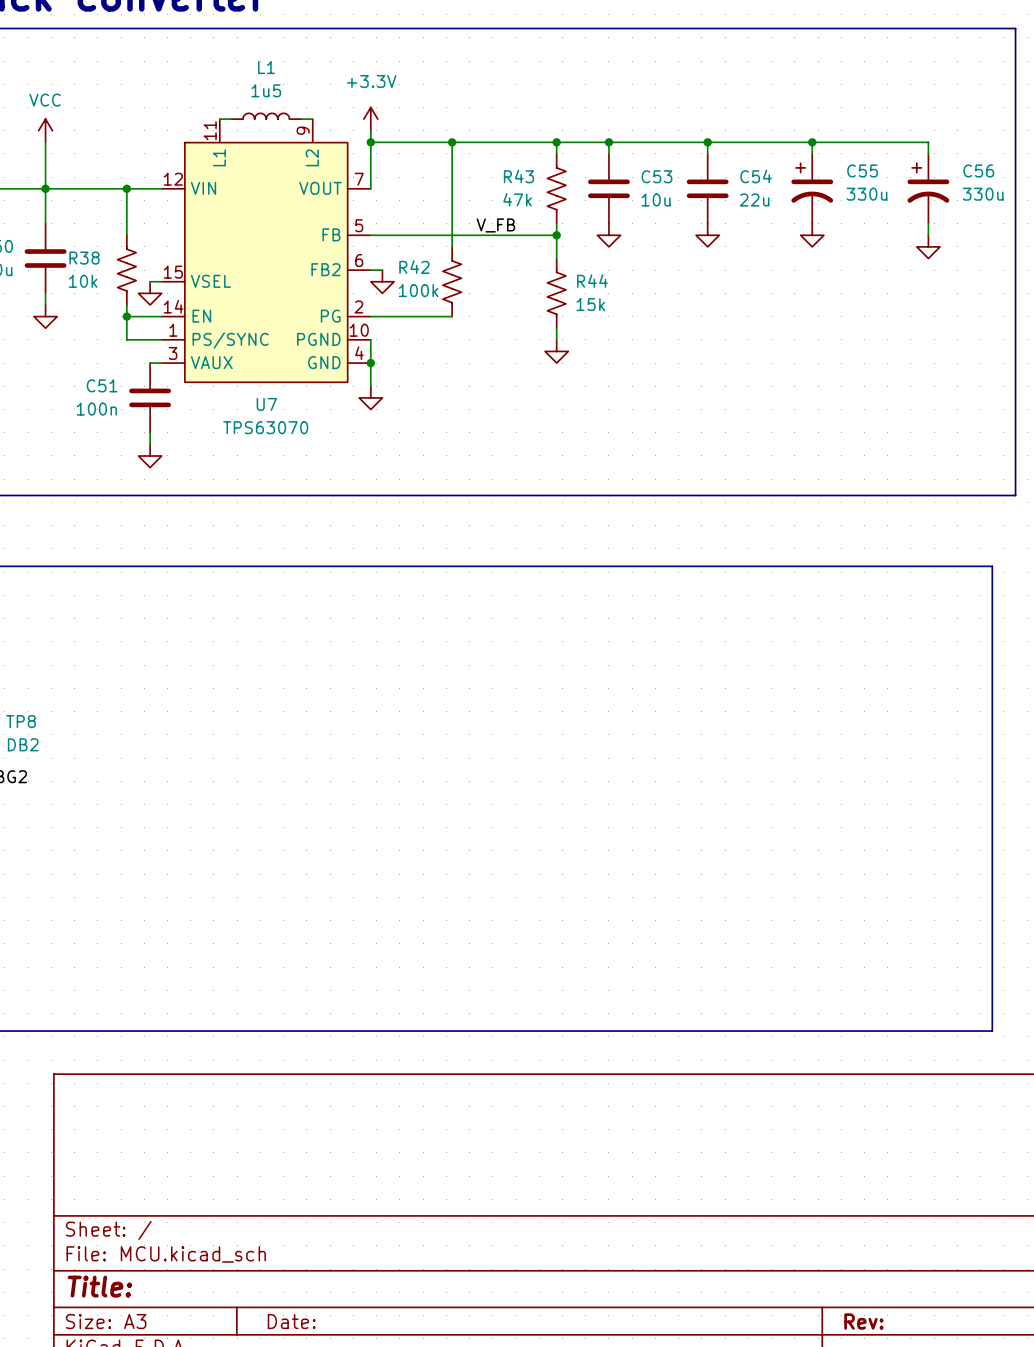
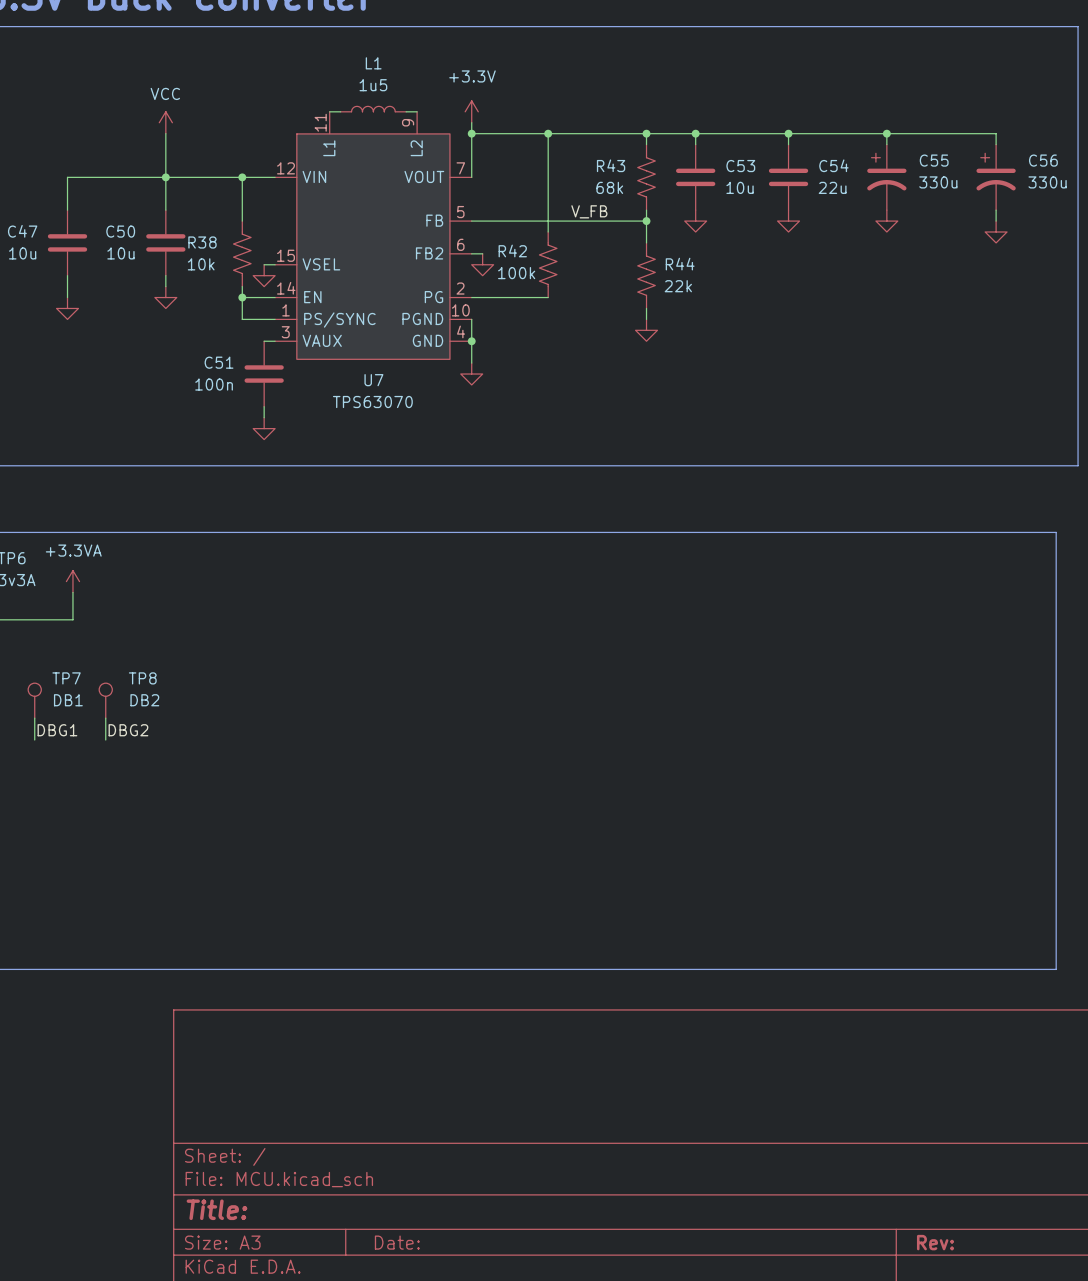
R43 value: 47k (517, 199) -> 68k (609, 187)
R44 value: 15k (590, 304) -> 22k (678, 286)

